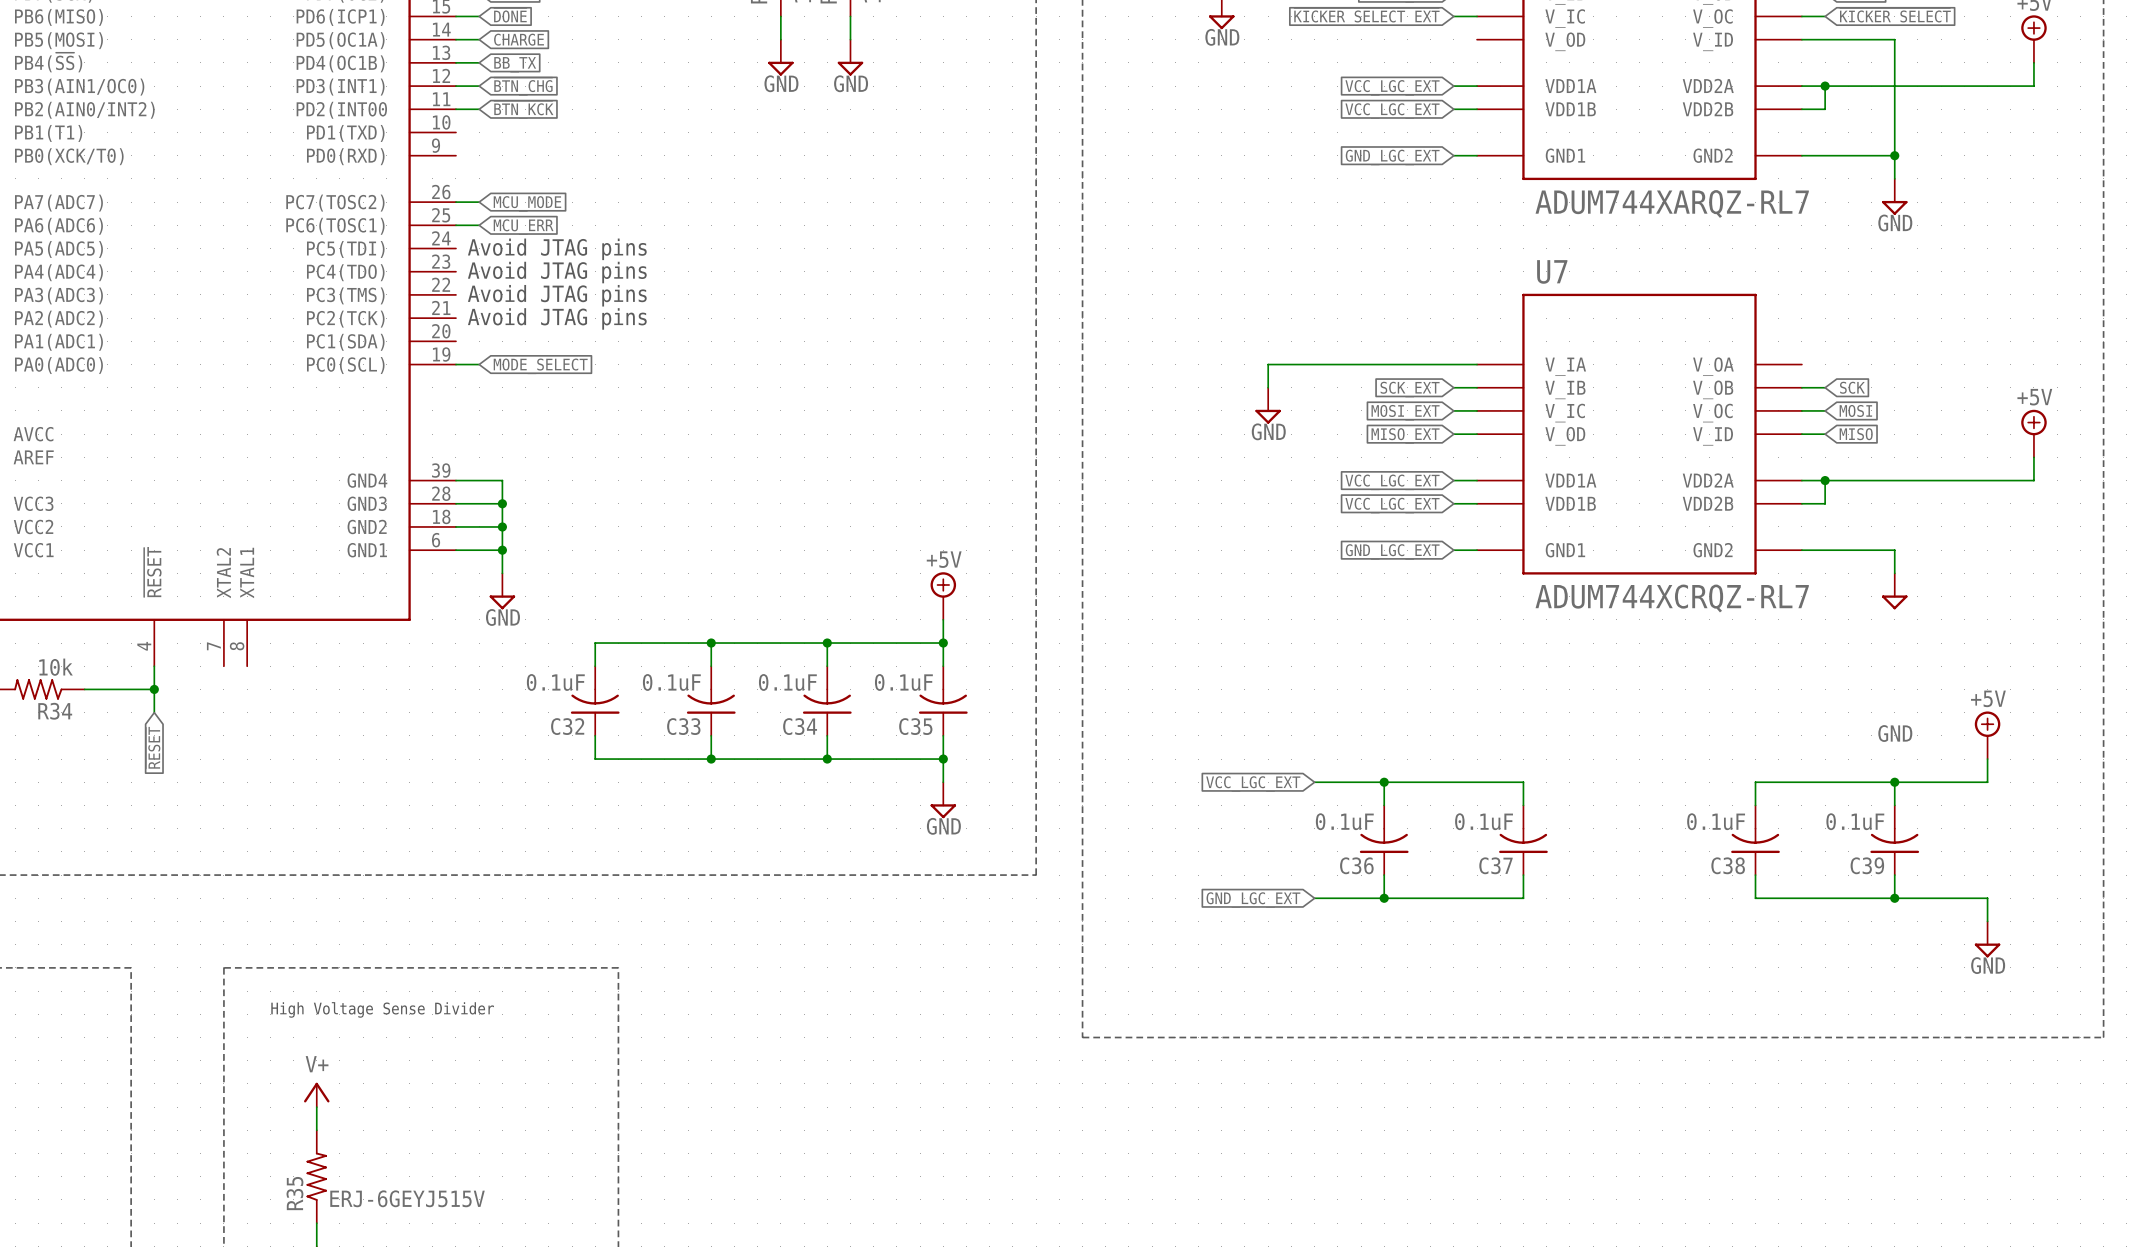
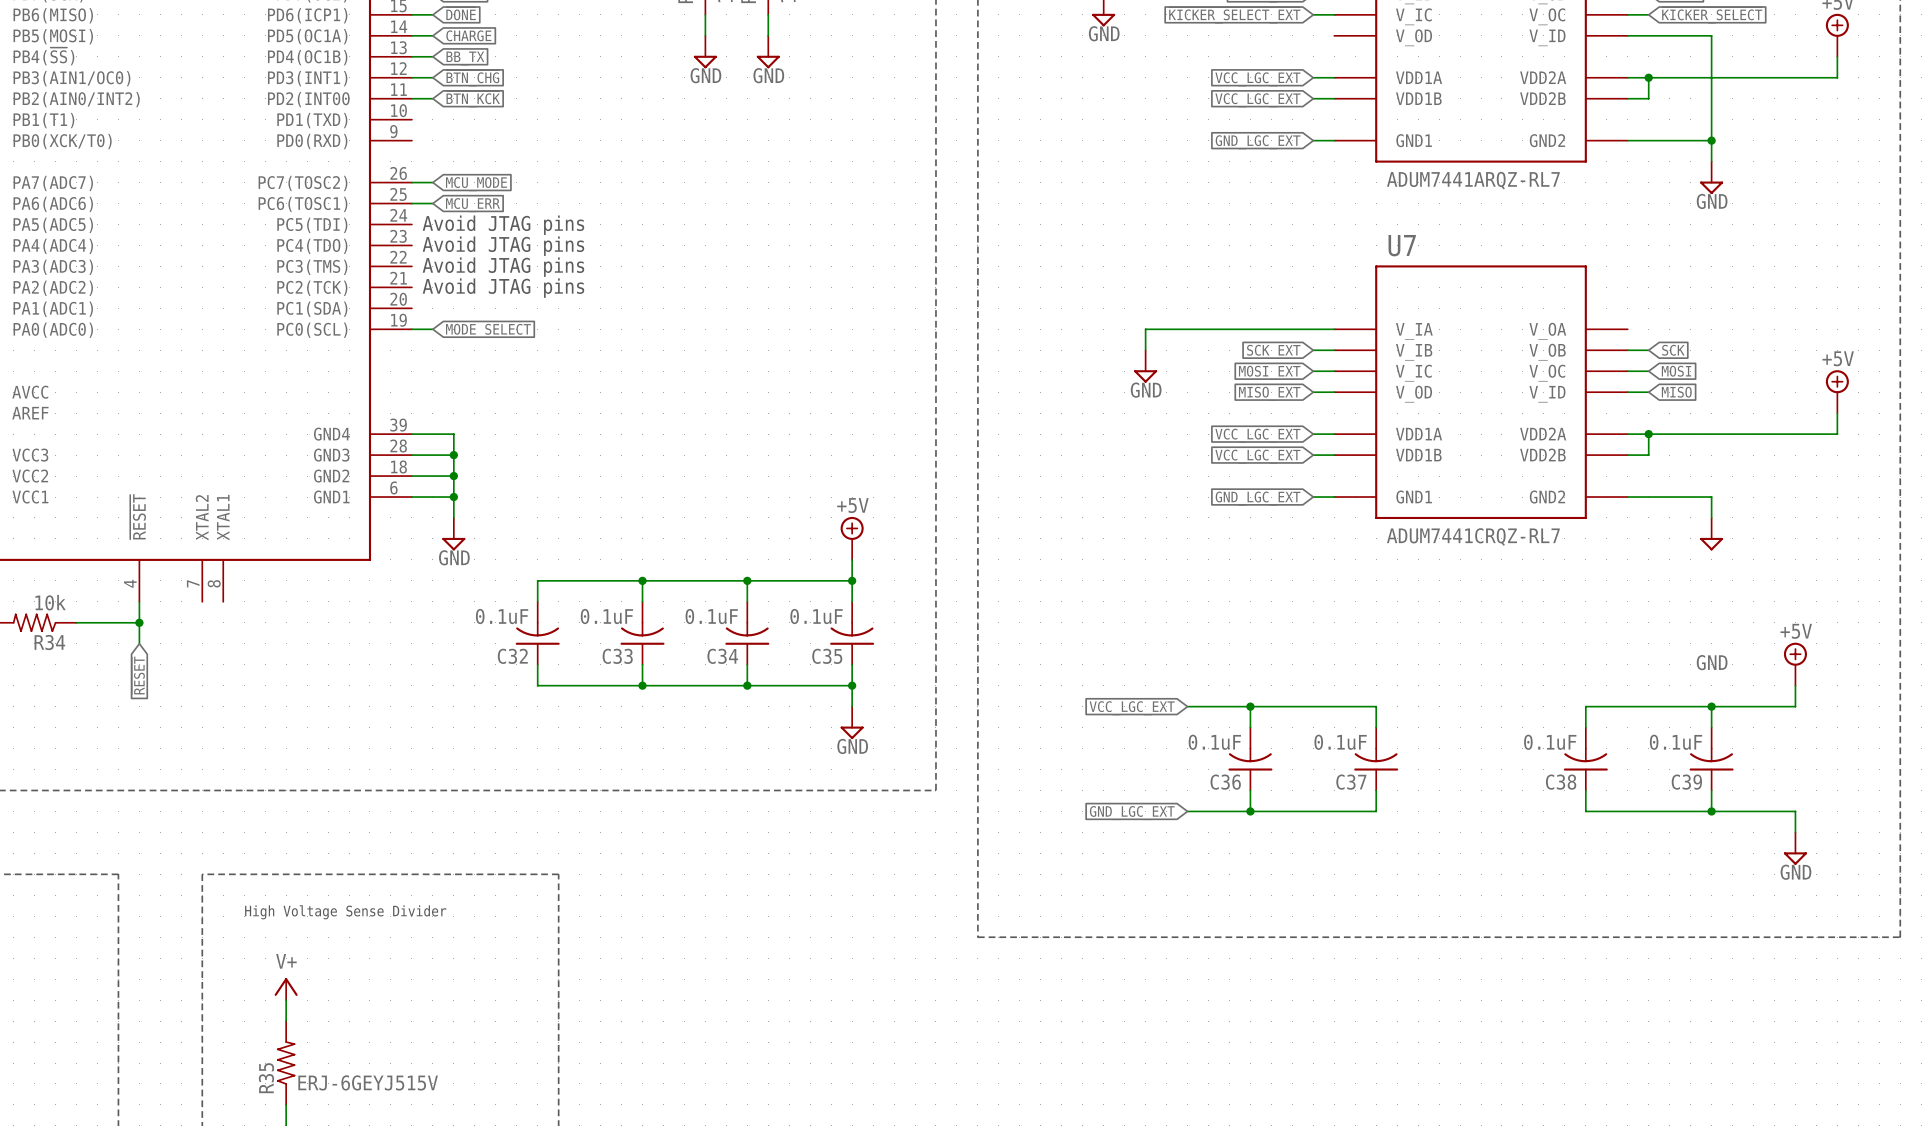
part value: ADUM744XARQZ-RL7 (1672, 203) -> ADUM7441ARQZ-RL7 (1473, 180)
U7 value: ADUM744XCRQZ-RL7 (1672, 598) -> ADUM7441CRQZ-RL7 (1473, 536)

